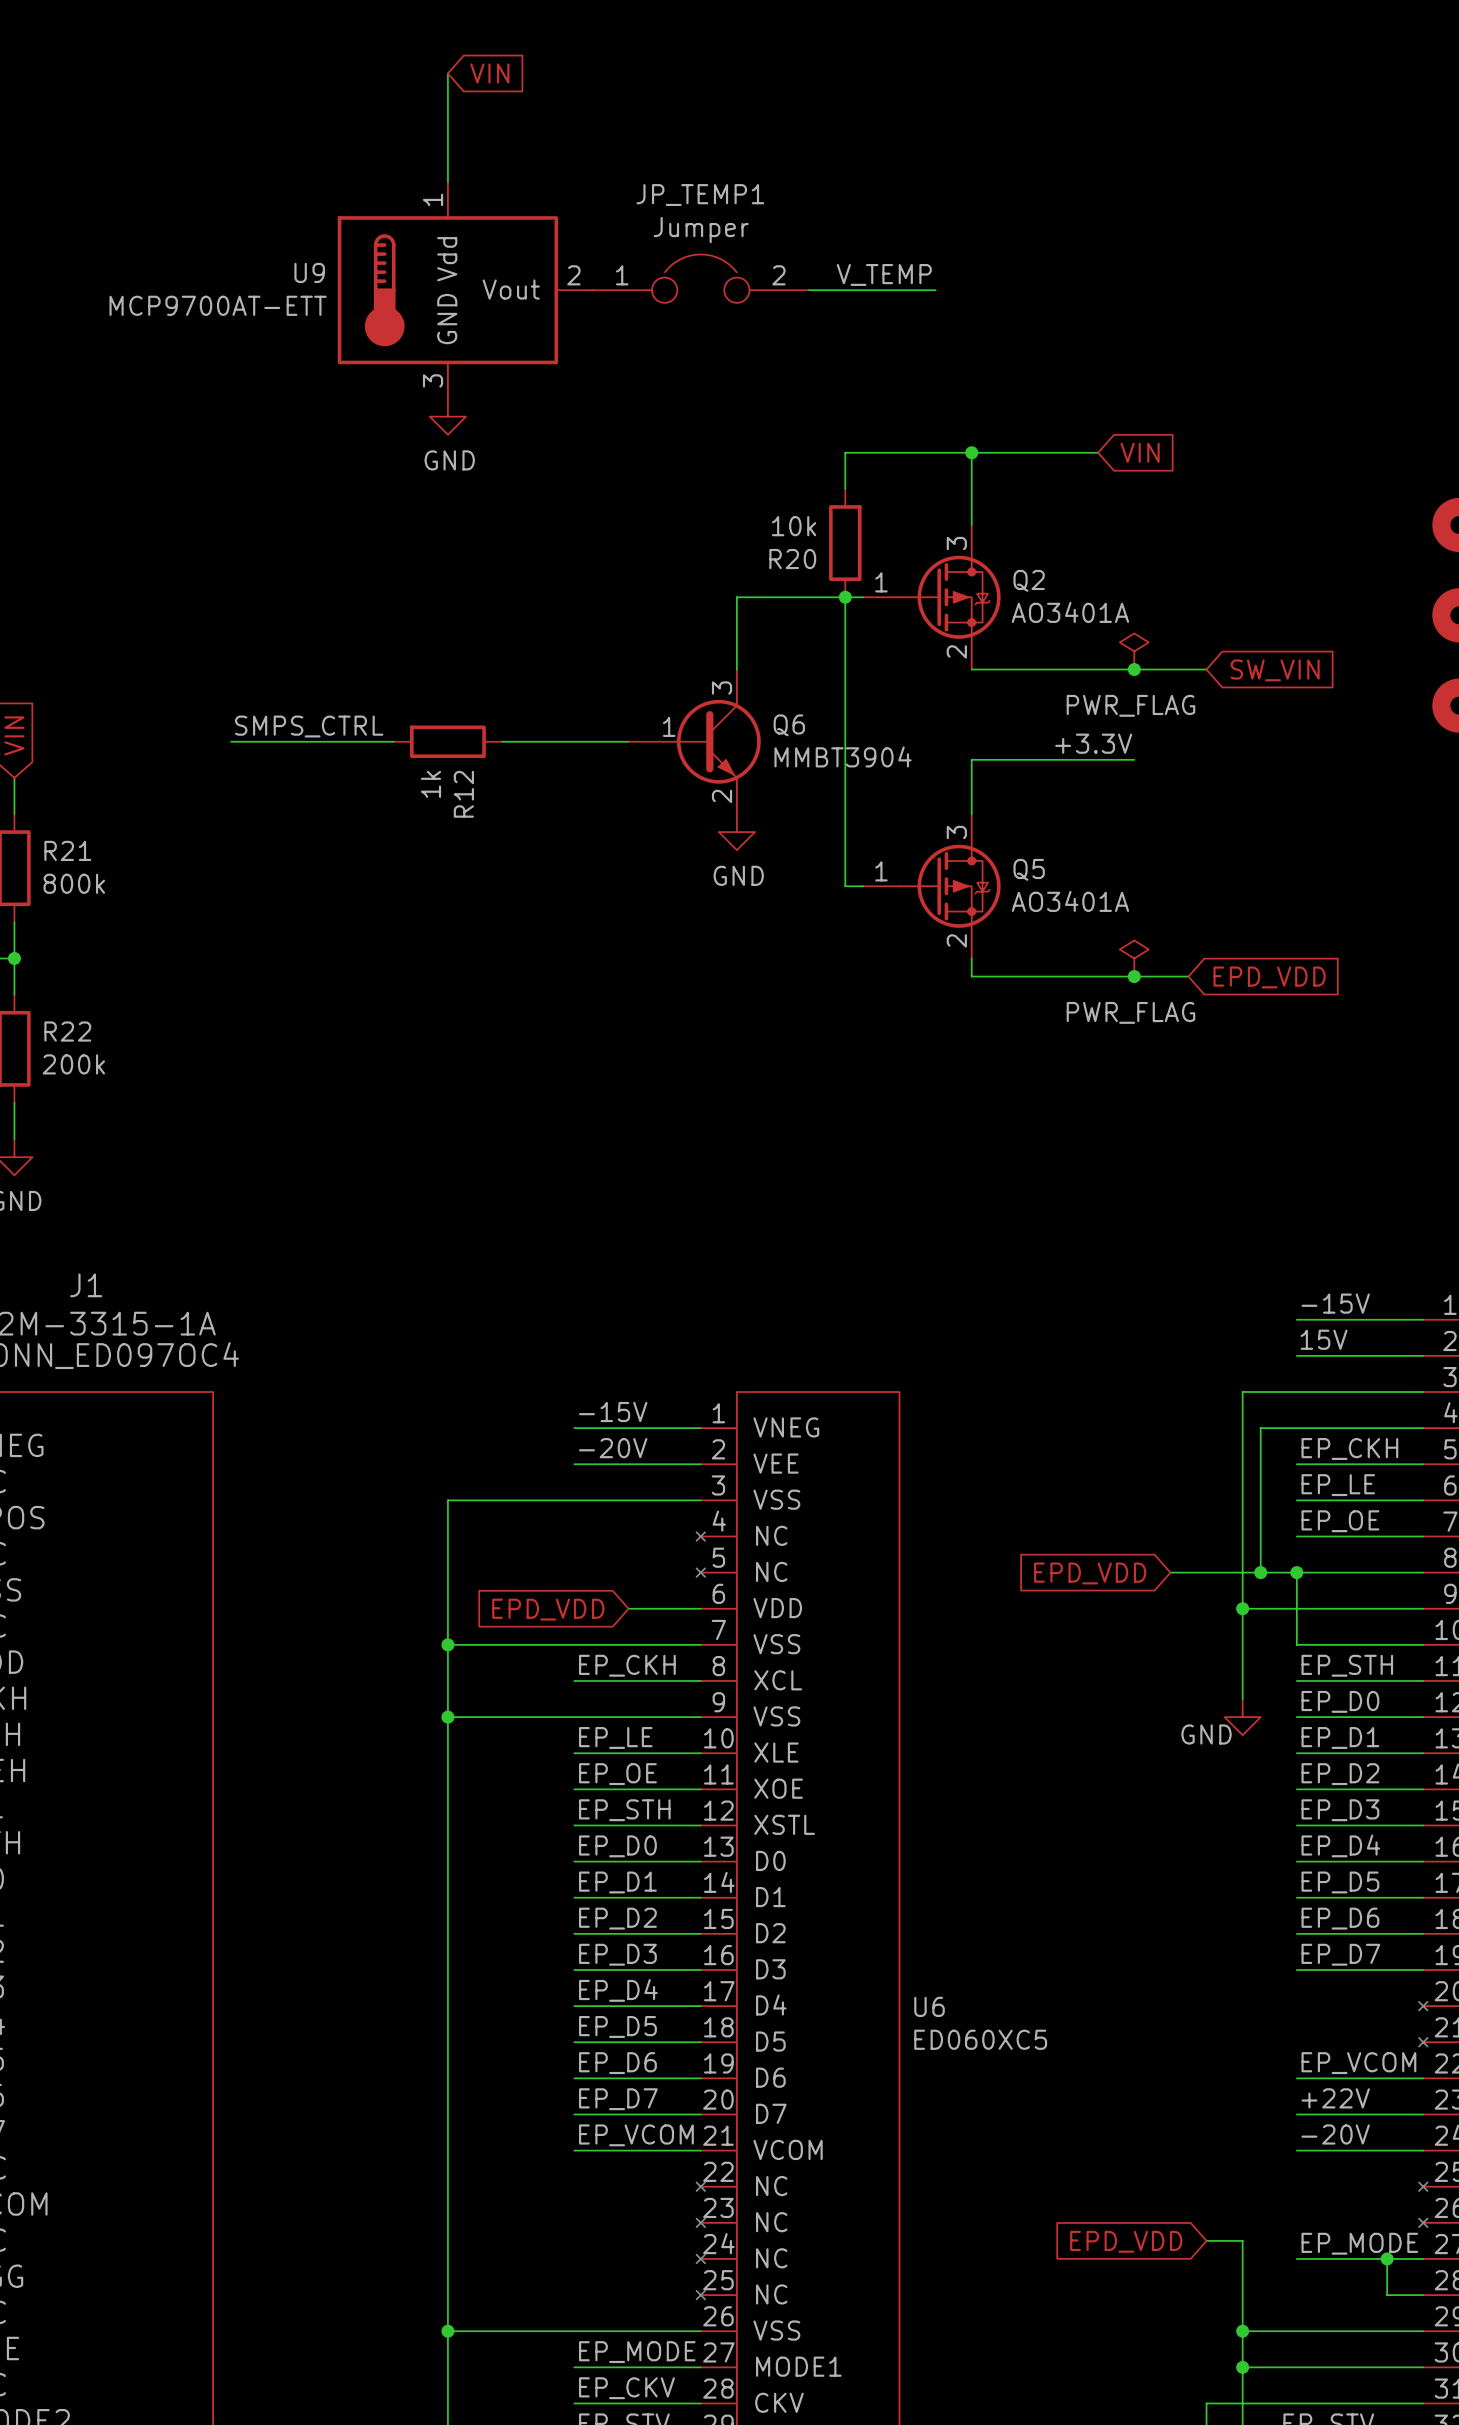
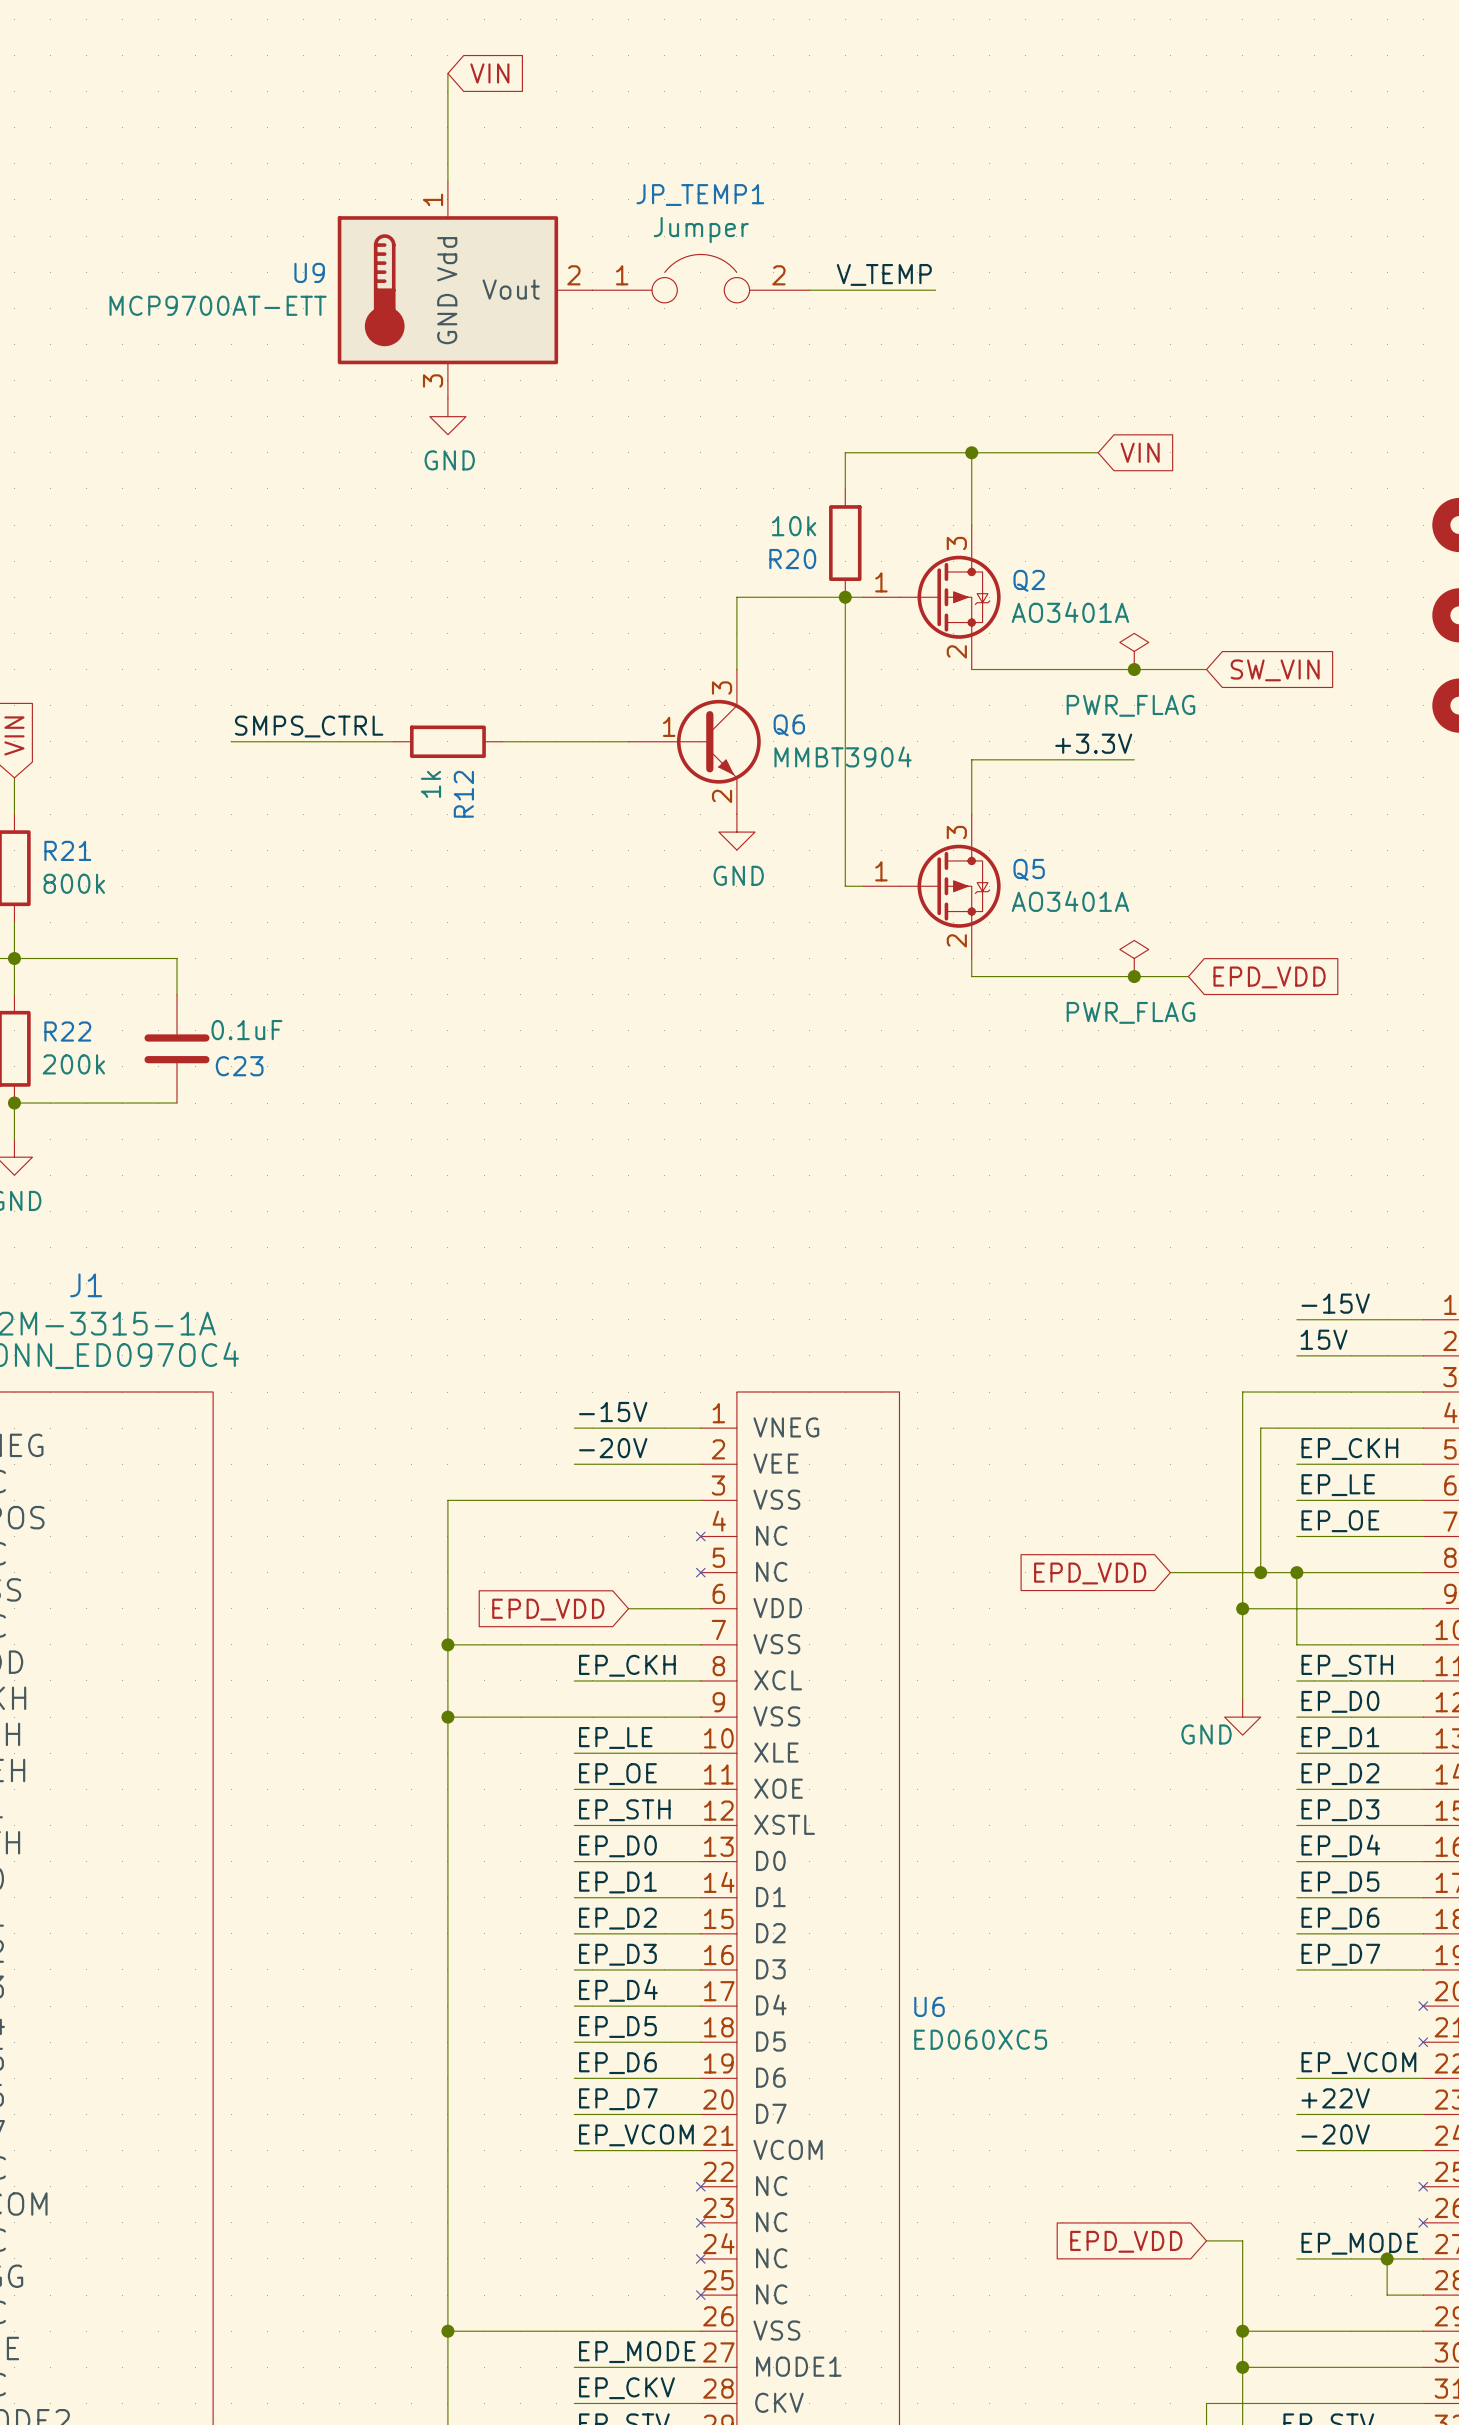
wire: none -> (14, 958) (176, 958) (176, 994)
C23: none -> 0.1uF (176, 1048)
wire: none -> (14, 1103) (176, 1103)
junction: none -> (14, 1103)

